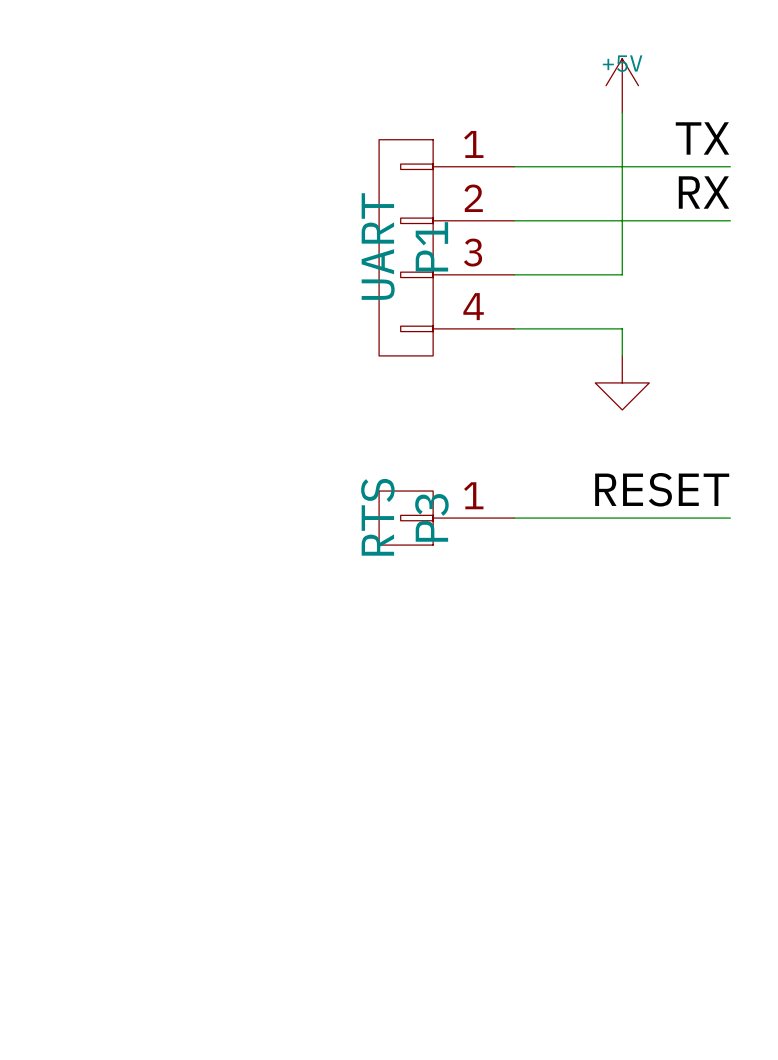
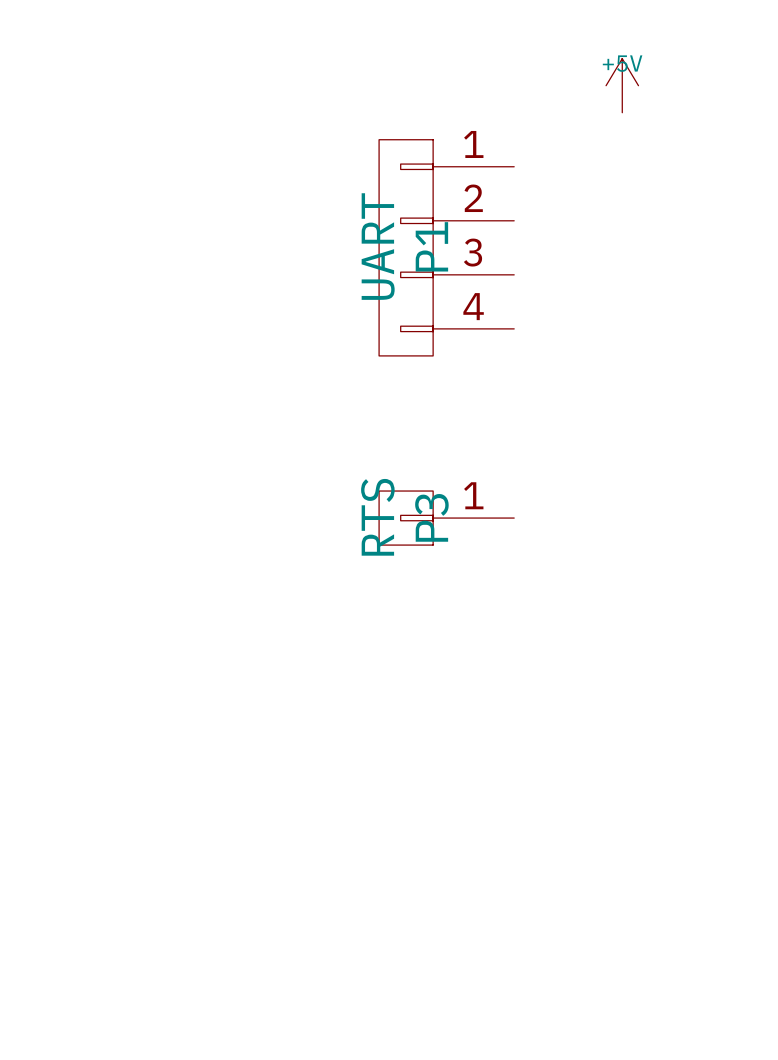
wire: (622, 112) (622, 274) (514, 274) -> none
label: TX (702, 138) -> none
wire: (514, 166) (730, 166) -> none
label: RX (704, 192) -> none
wire: (514, 220) (730, 220) -> none
wire: (514, 328) (622, 328) (622, 355) -> none
power symbol: (622, 382) -> none
label: RESET (662, 489) -> none
wire: (514, 518) (730, 518) -> none

